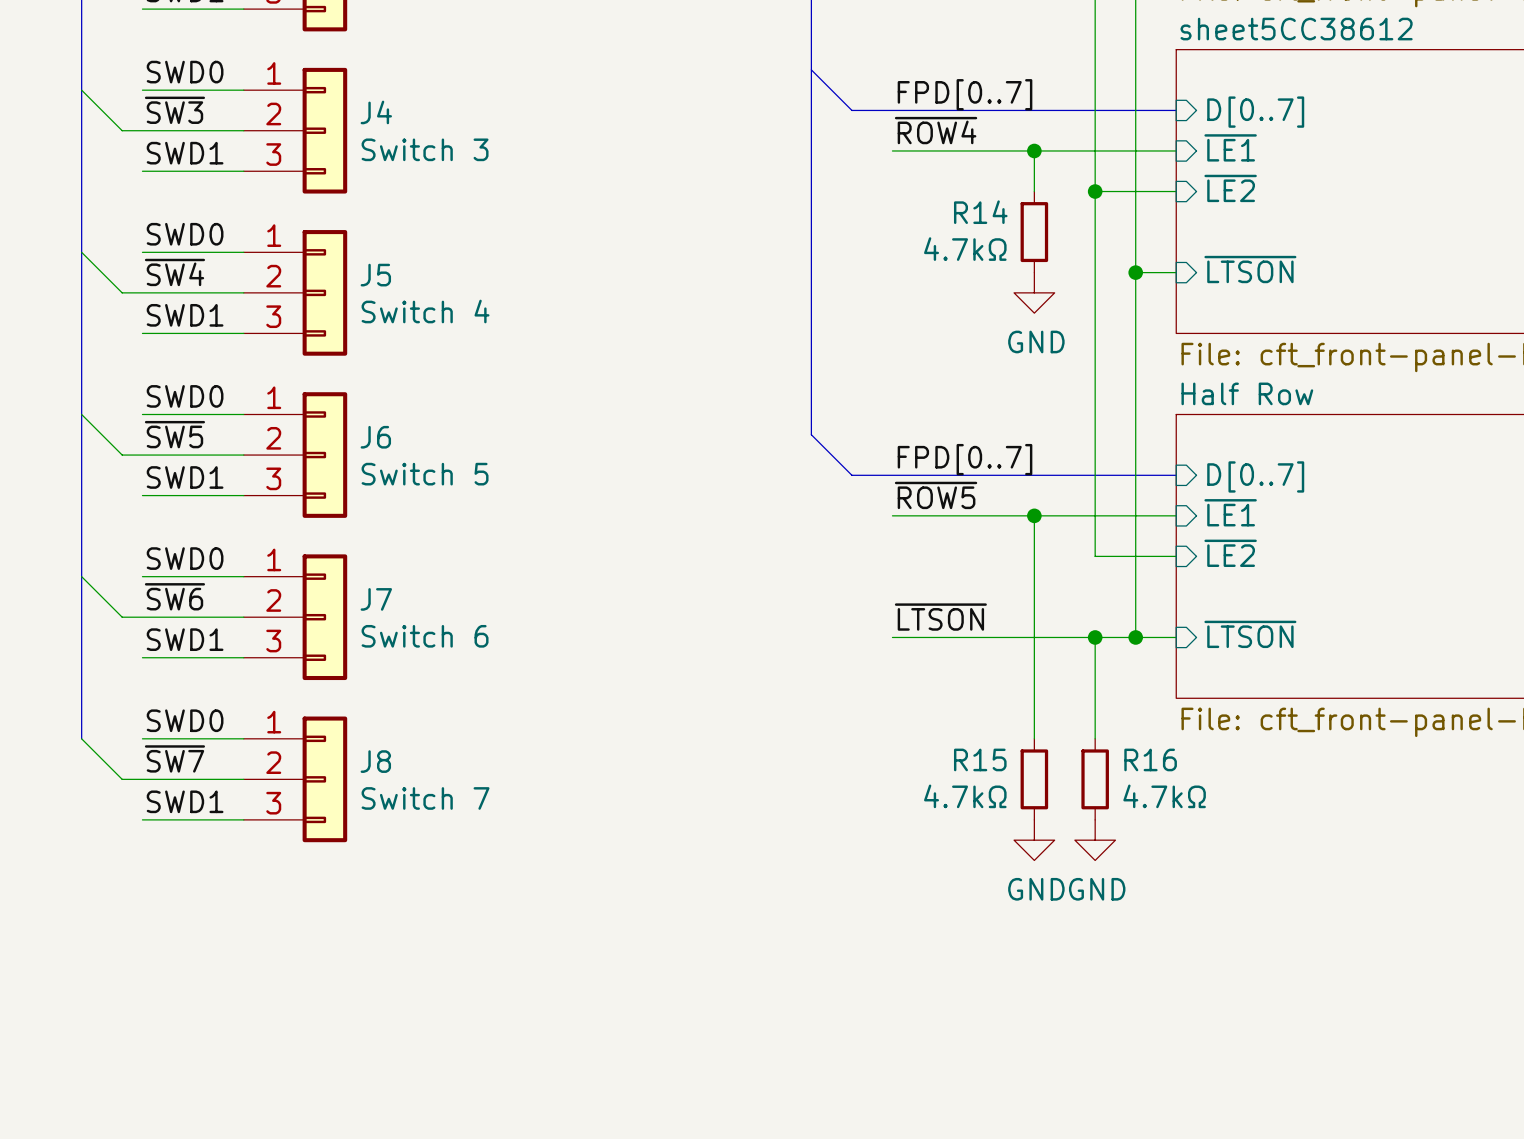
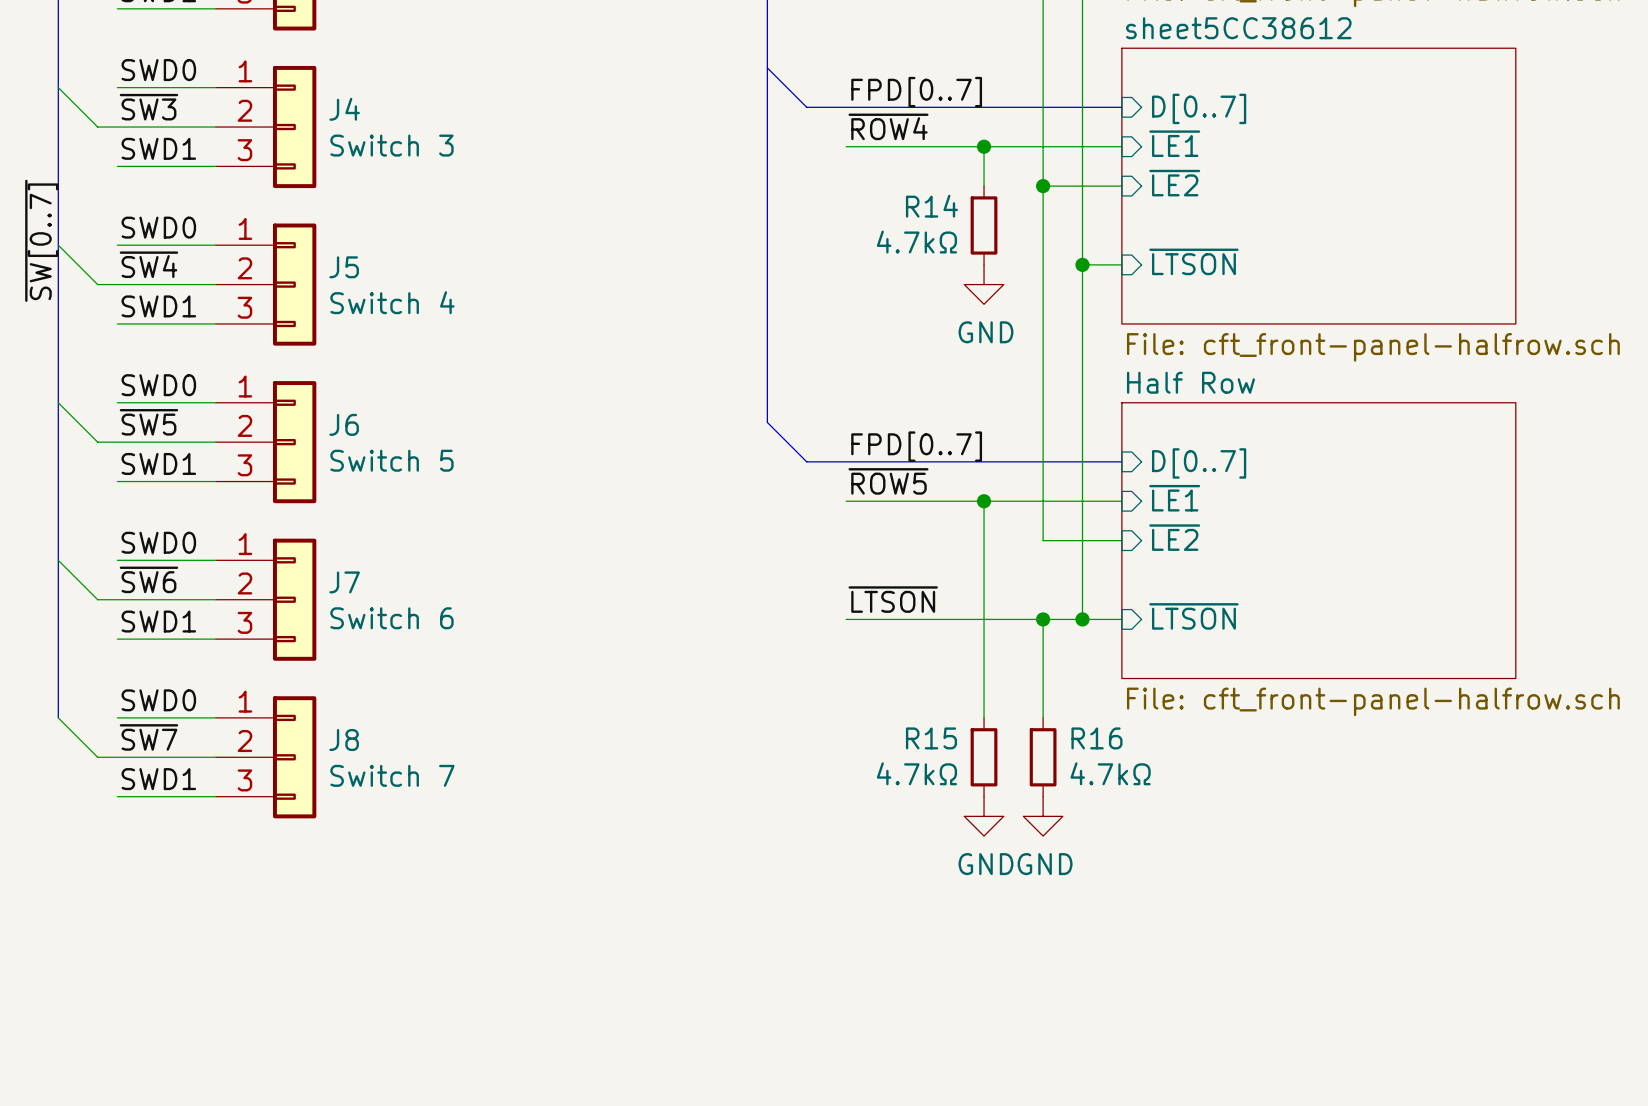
label: none -> ~{SW[0..7]} (41, 240)

